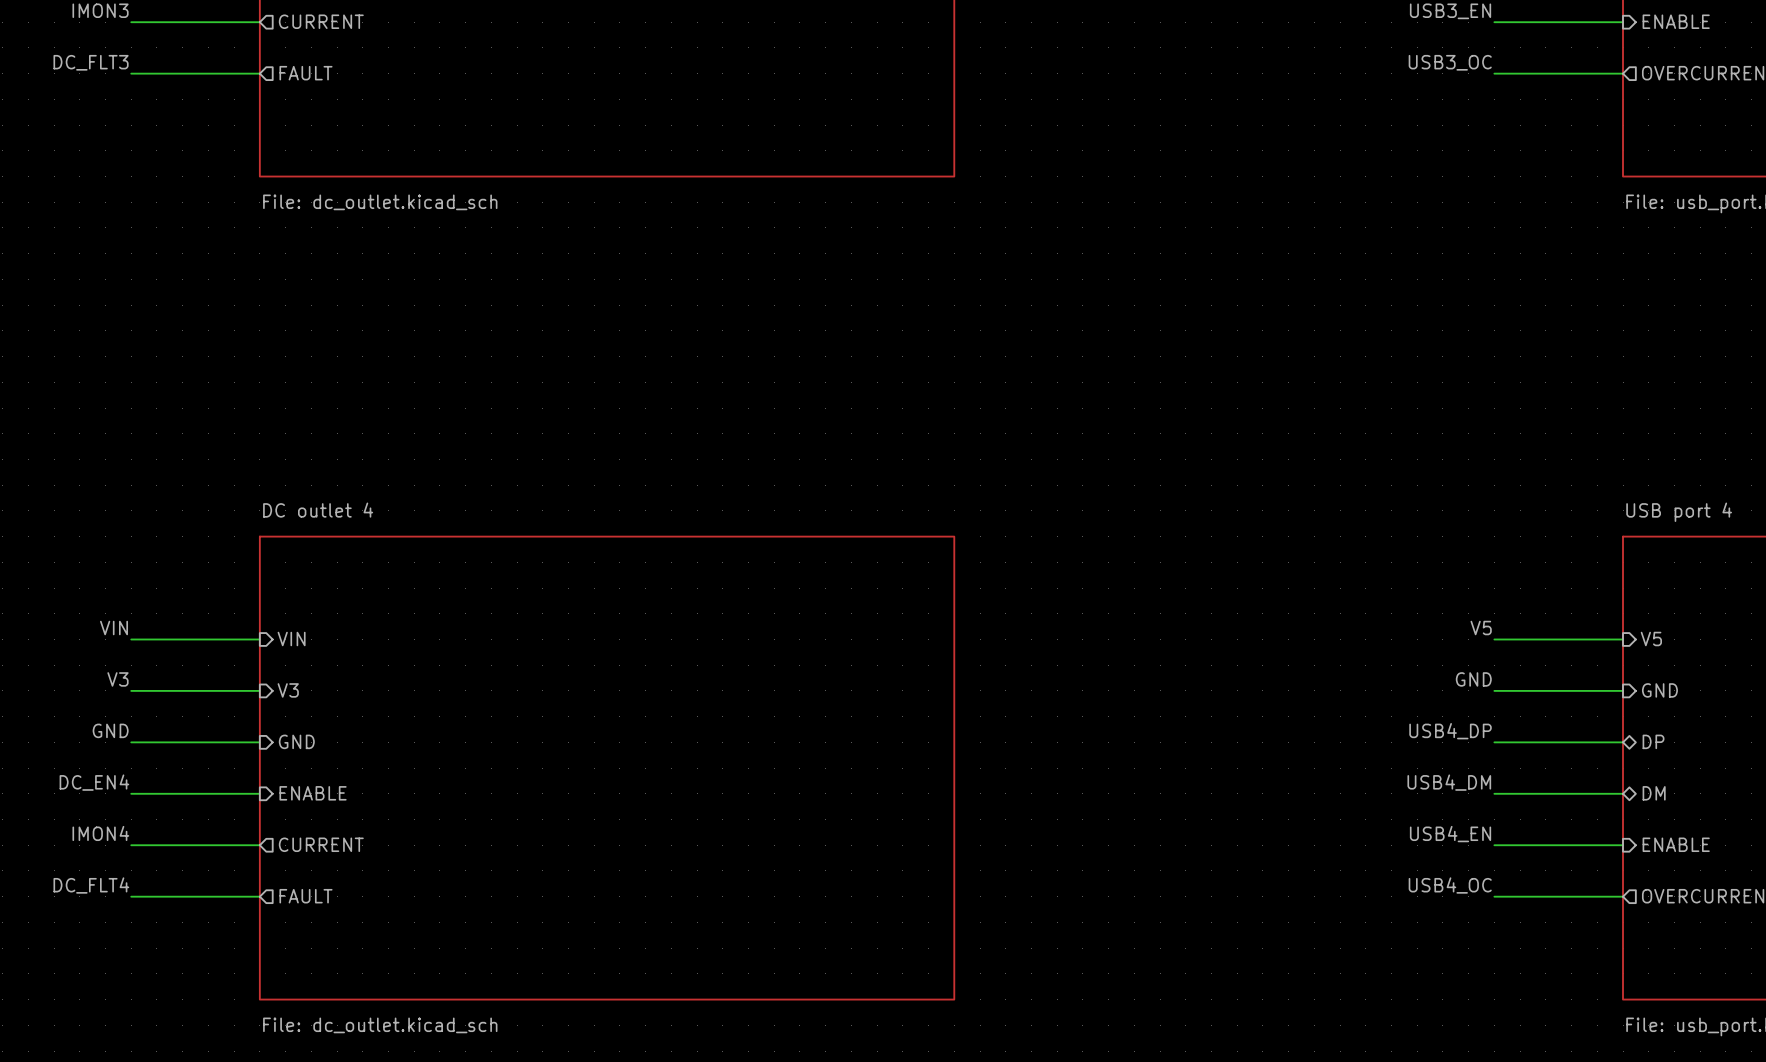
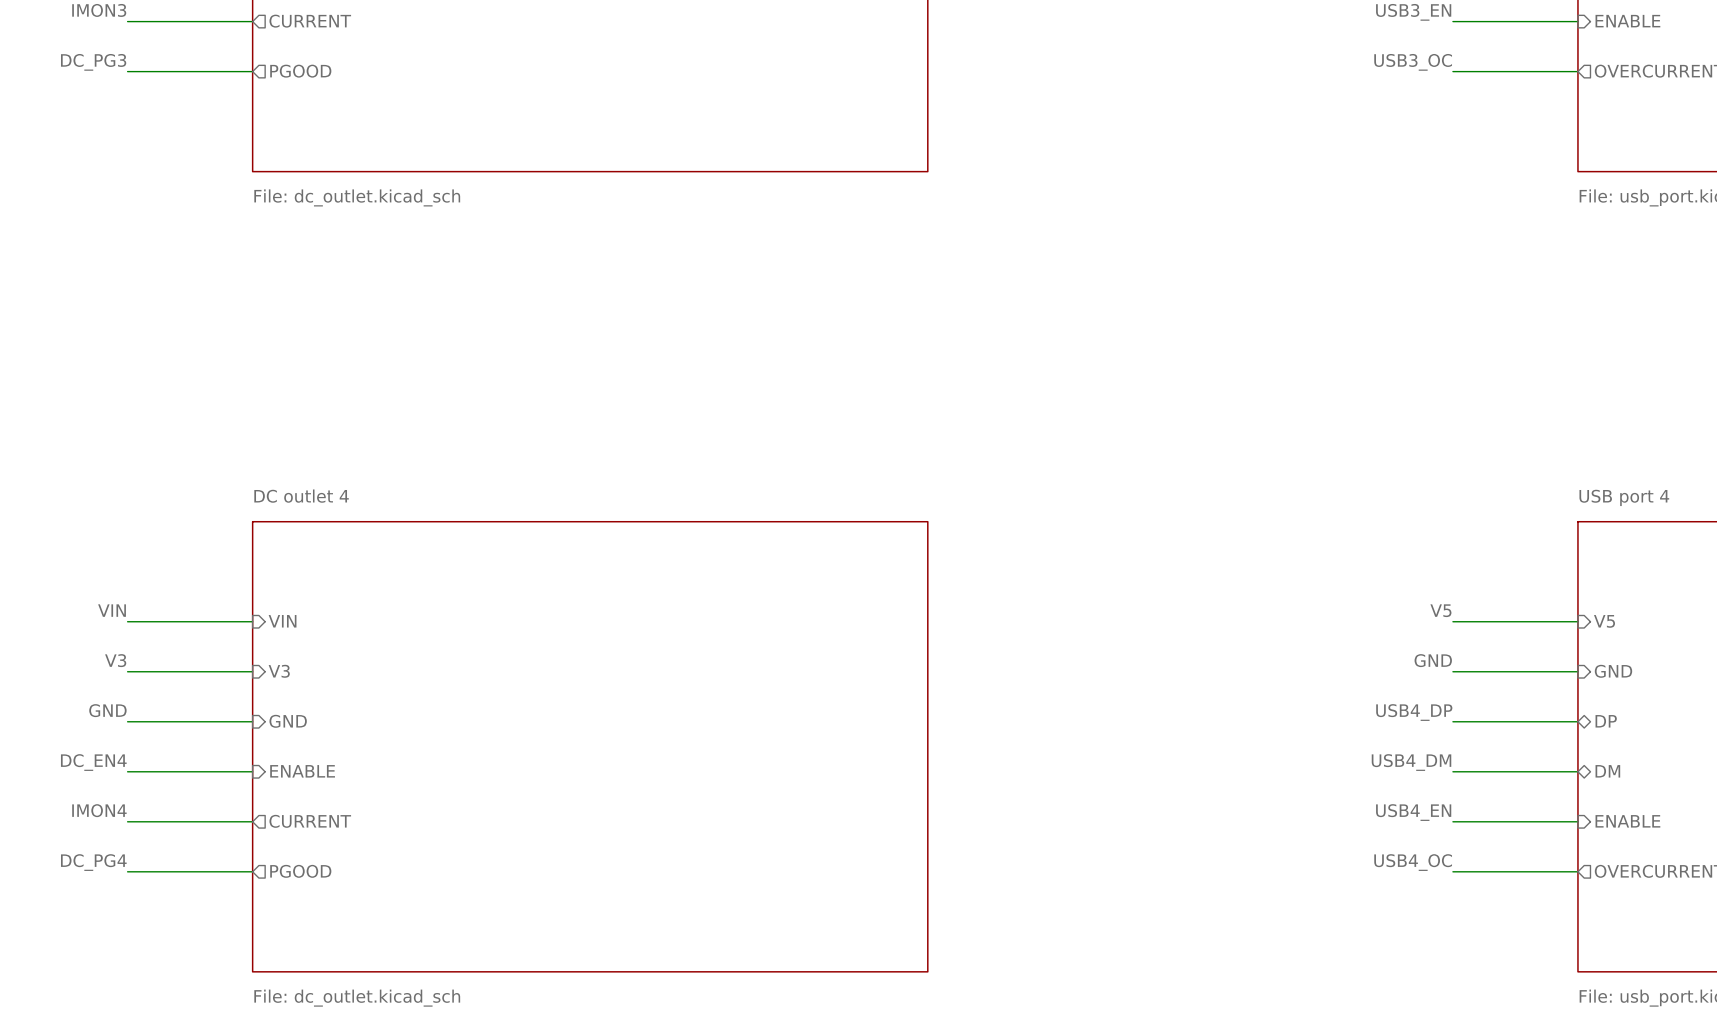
label: DC_FLT3 (91, 62) -> DC_PG3 (93, 62)
sheet pin: FAULT (305, 73) -> PGOOD (300, 71)
label: DC_FLT4 (91, 885) -> DC_PG4 (93, 862)
sheet pin: FAULT (305, 896) -> PGOOD (300, 871)

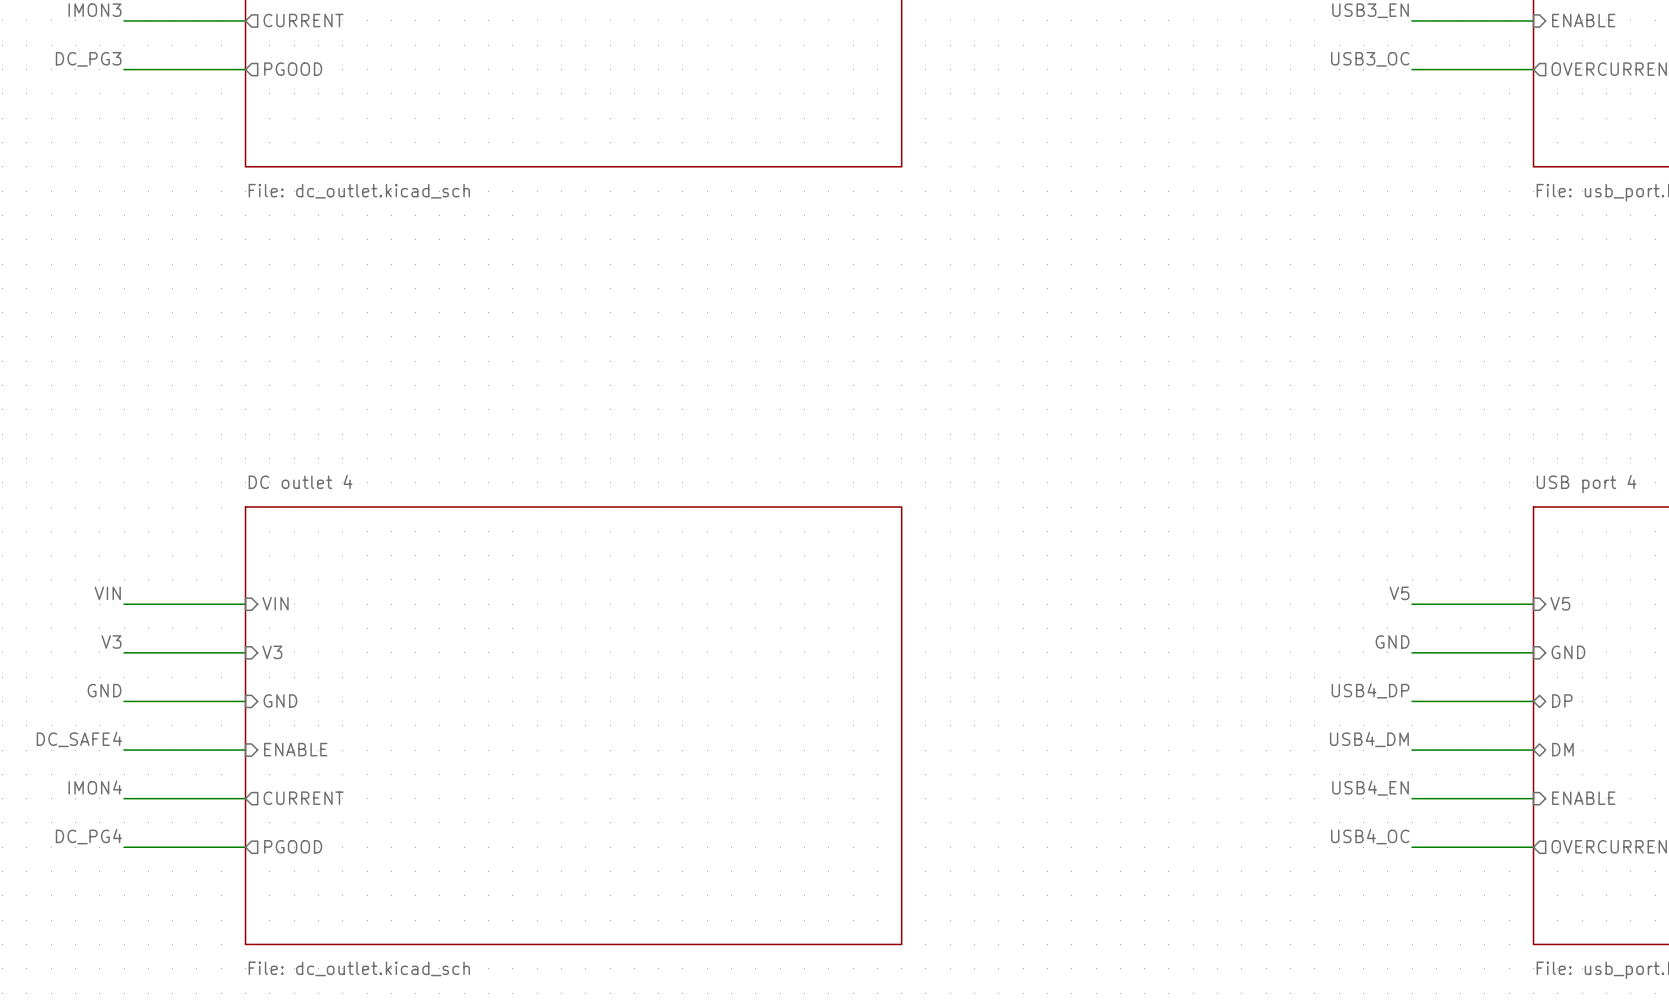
label: DC_EN4 (93, 762) -> DC_SAFE4 (79, 739)

